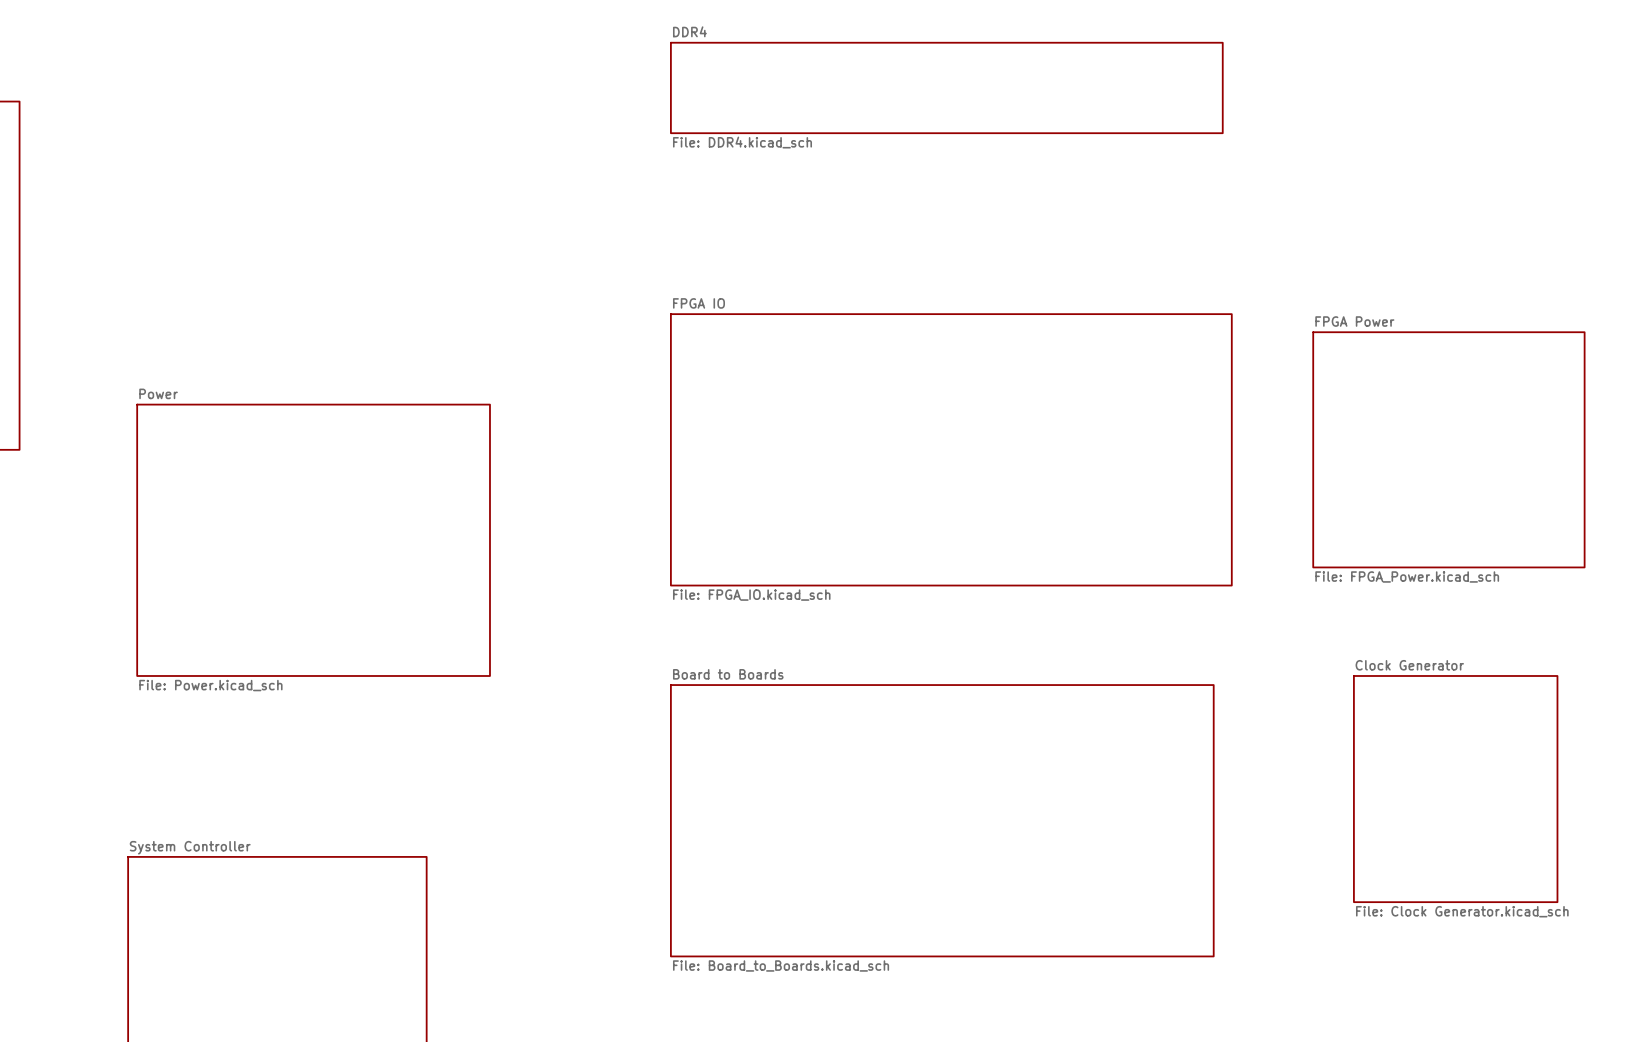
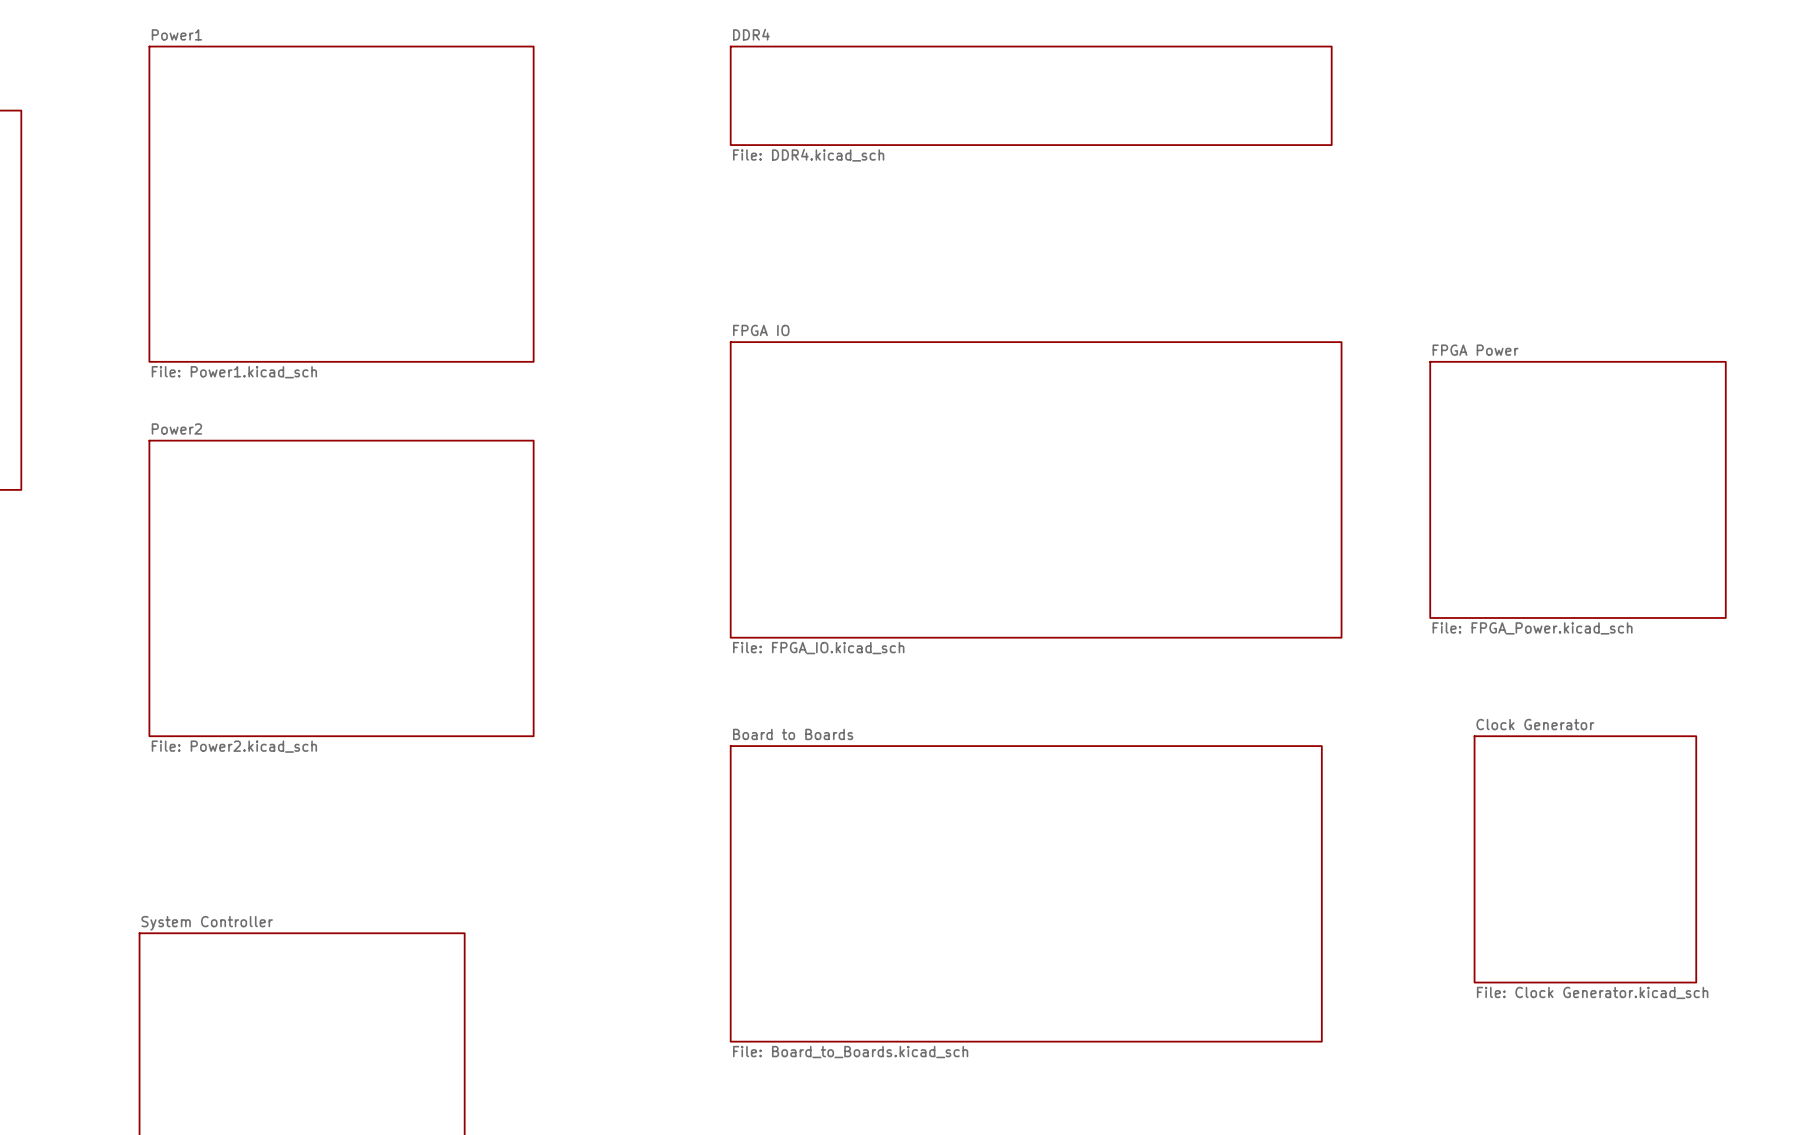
sheet Power1: none -> File: Power1.kicad_sch (341, 204)
sheet Power name: Power (158, 393) -> Power2 (176, 428)
sheet Power value: File: Power.kicad_sch (210, 685) -> File: Power2.kicad_sch (234, 746)

